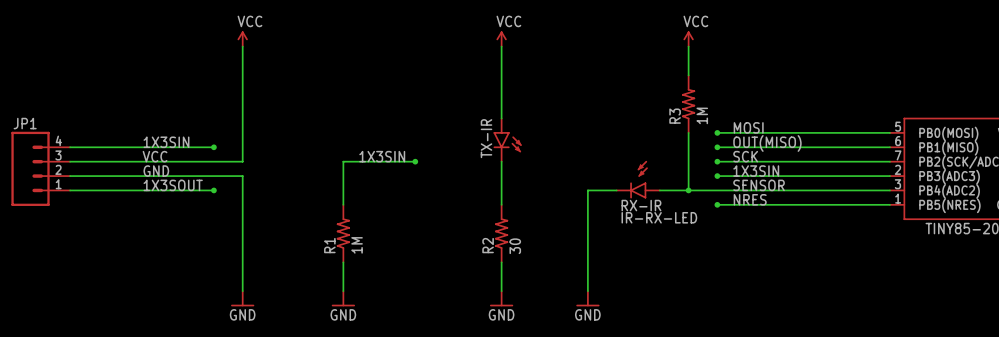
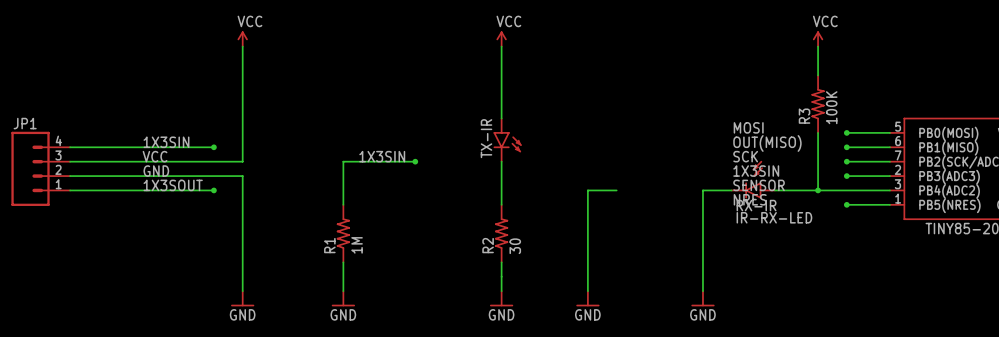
power symbol: VCC (688, 39) -> none
power symbol: none -> VCC (818, 39)
wire: (688, 46) (688, 75) -> (818, 46) (818, 75)
R3 position: (688, 104) -> (818, 104)
R3 value: 1M (702, 115) -> 100K (831, 107)
wire: (688, 132) (688, 190) -> (818, 132) (818, 190)
wire: (717, 132) (846, 132) -> none
junction: (717, 132) -> none
junction: none -> (846, 132)
wire: (717, 147) (846, 147) -> none
junction: (717, 147) -> none
junction: none -> (846, 147)
wire: (717, 161) (846, 161) -> none
junction: (717, 161) -> none
junction: none -> (846, 161)
wire: (717, 176) (846, 176) -> none
junction: (717, 176) -> none
junction: none -> (846, 176)
RX-IR position: (638, 179) -> (753, 179)
wire: (659, 190) (702, 190) -> (702, 291) (702, 190)
junction: (688, 190) -> none
junction: none -> (818, 190)
wire: (717, 204) (846, 204) -> none
junction: (717, 204) -> none
junction: none -> (846, 204)
power symbol: none -> GND (702, 298)

